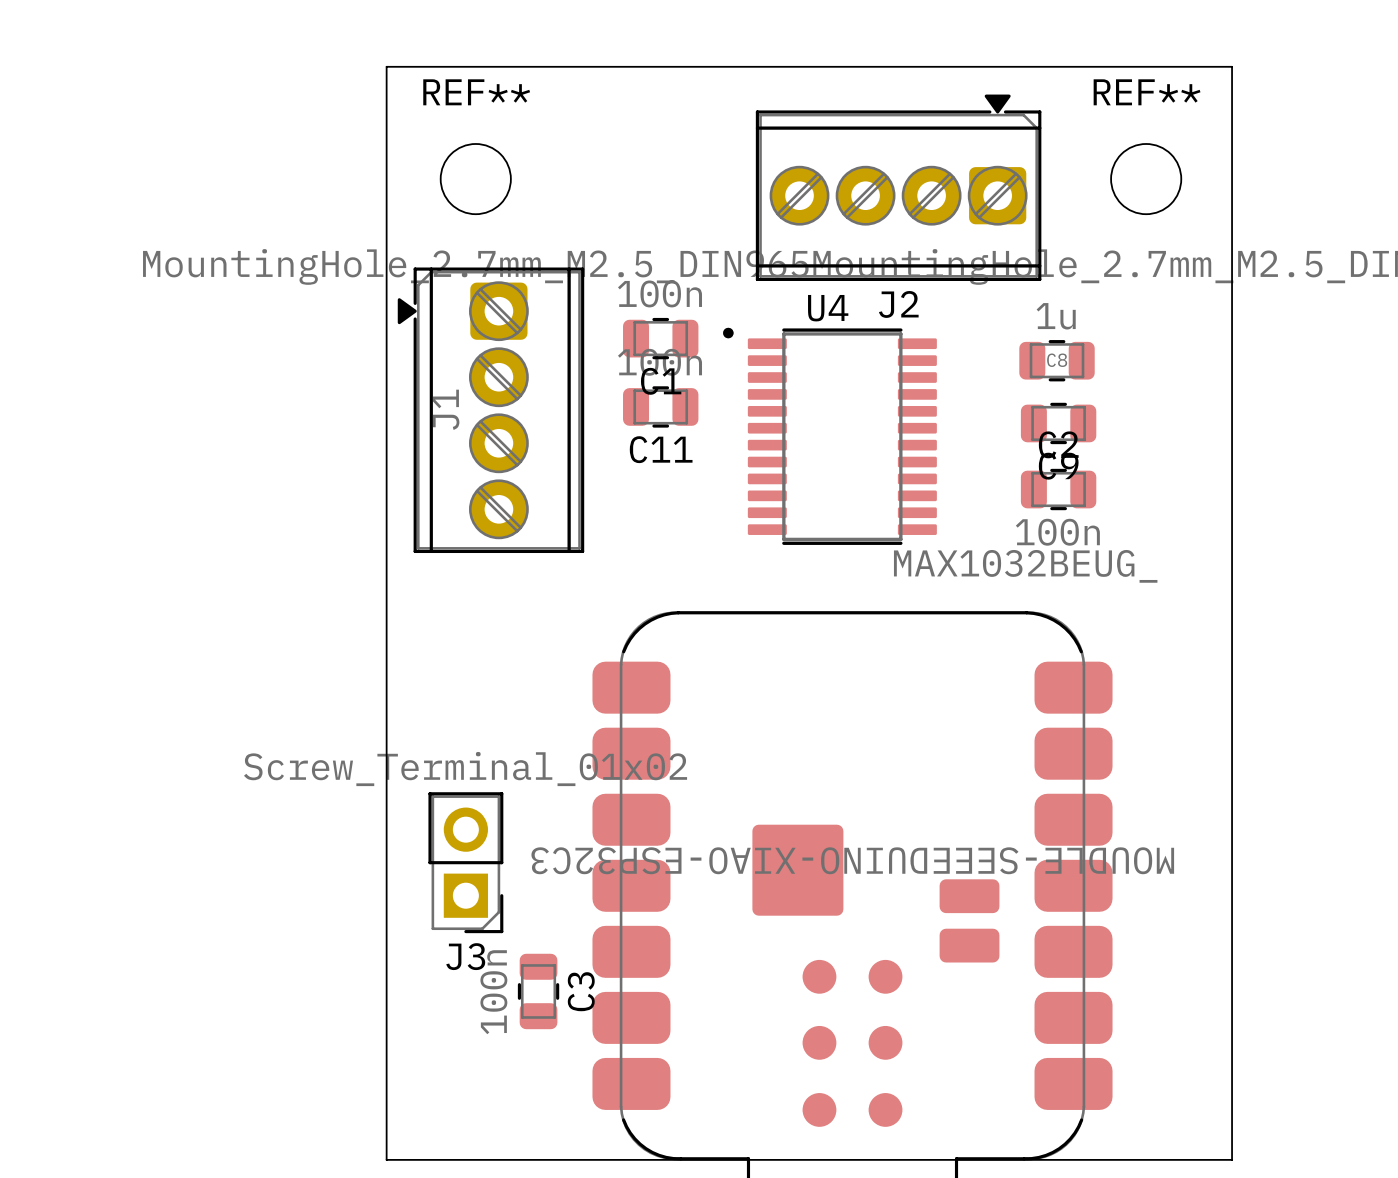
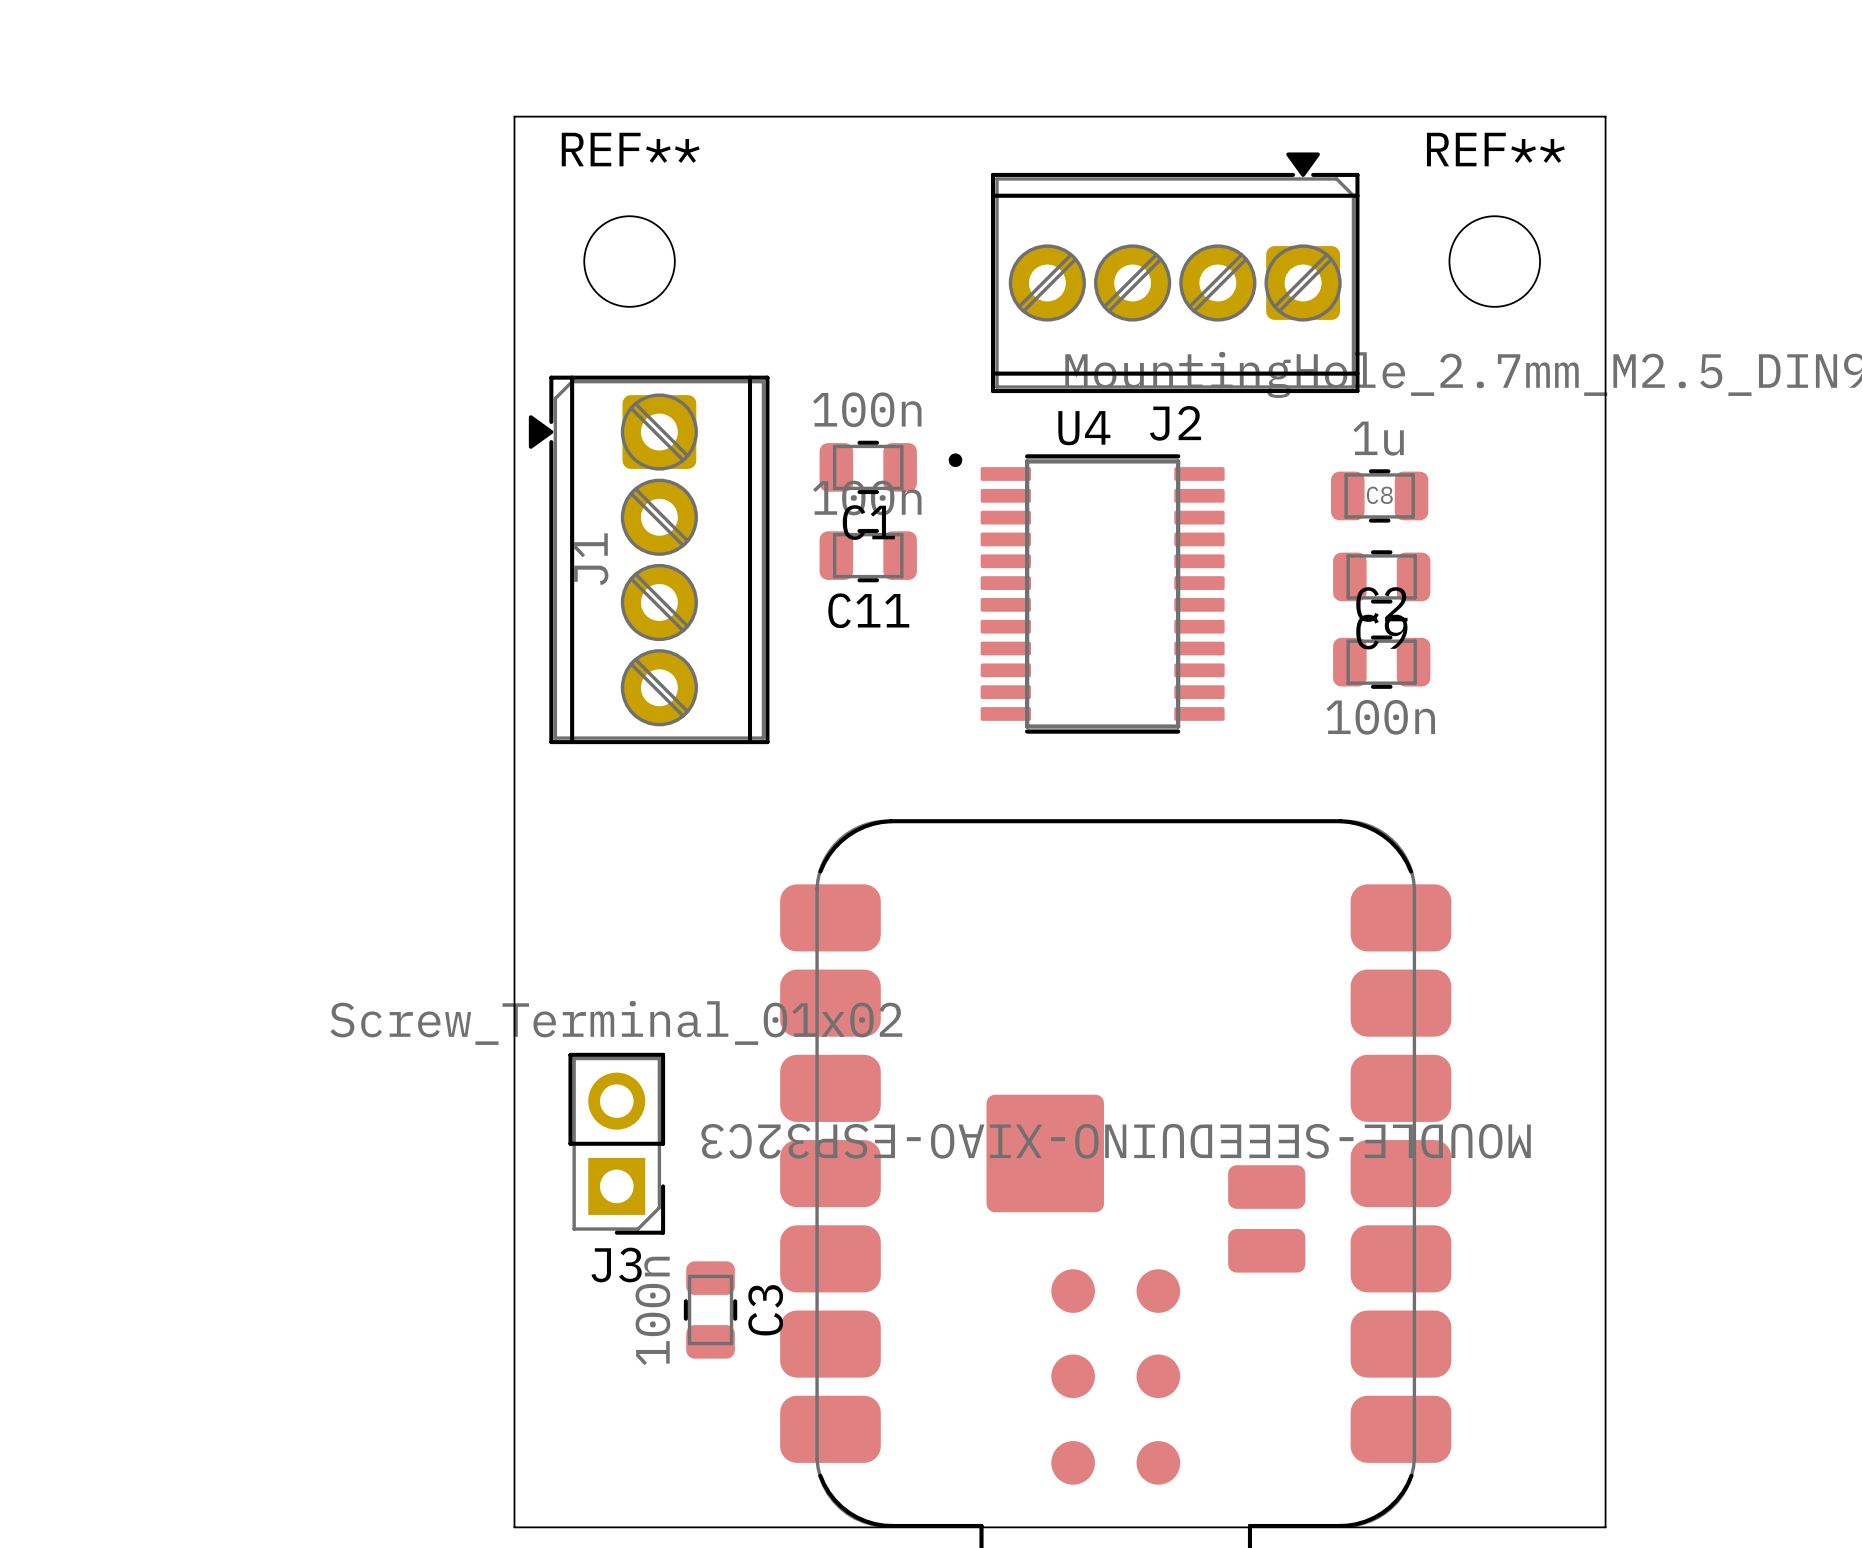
REF** value: MountingHole_2.7mm_M2.5_DIN965 (475, 266) -> none
U4 value: MAX1032BEUG_ (1025, 566) -> none

